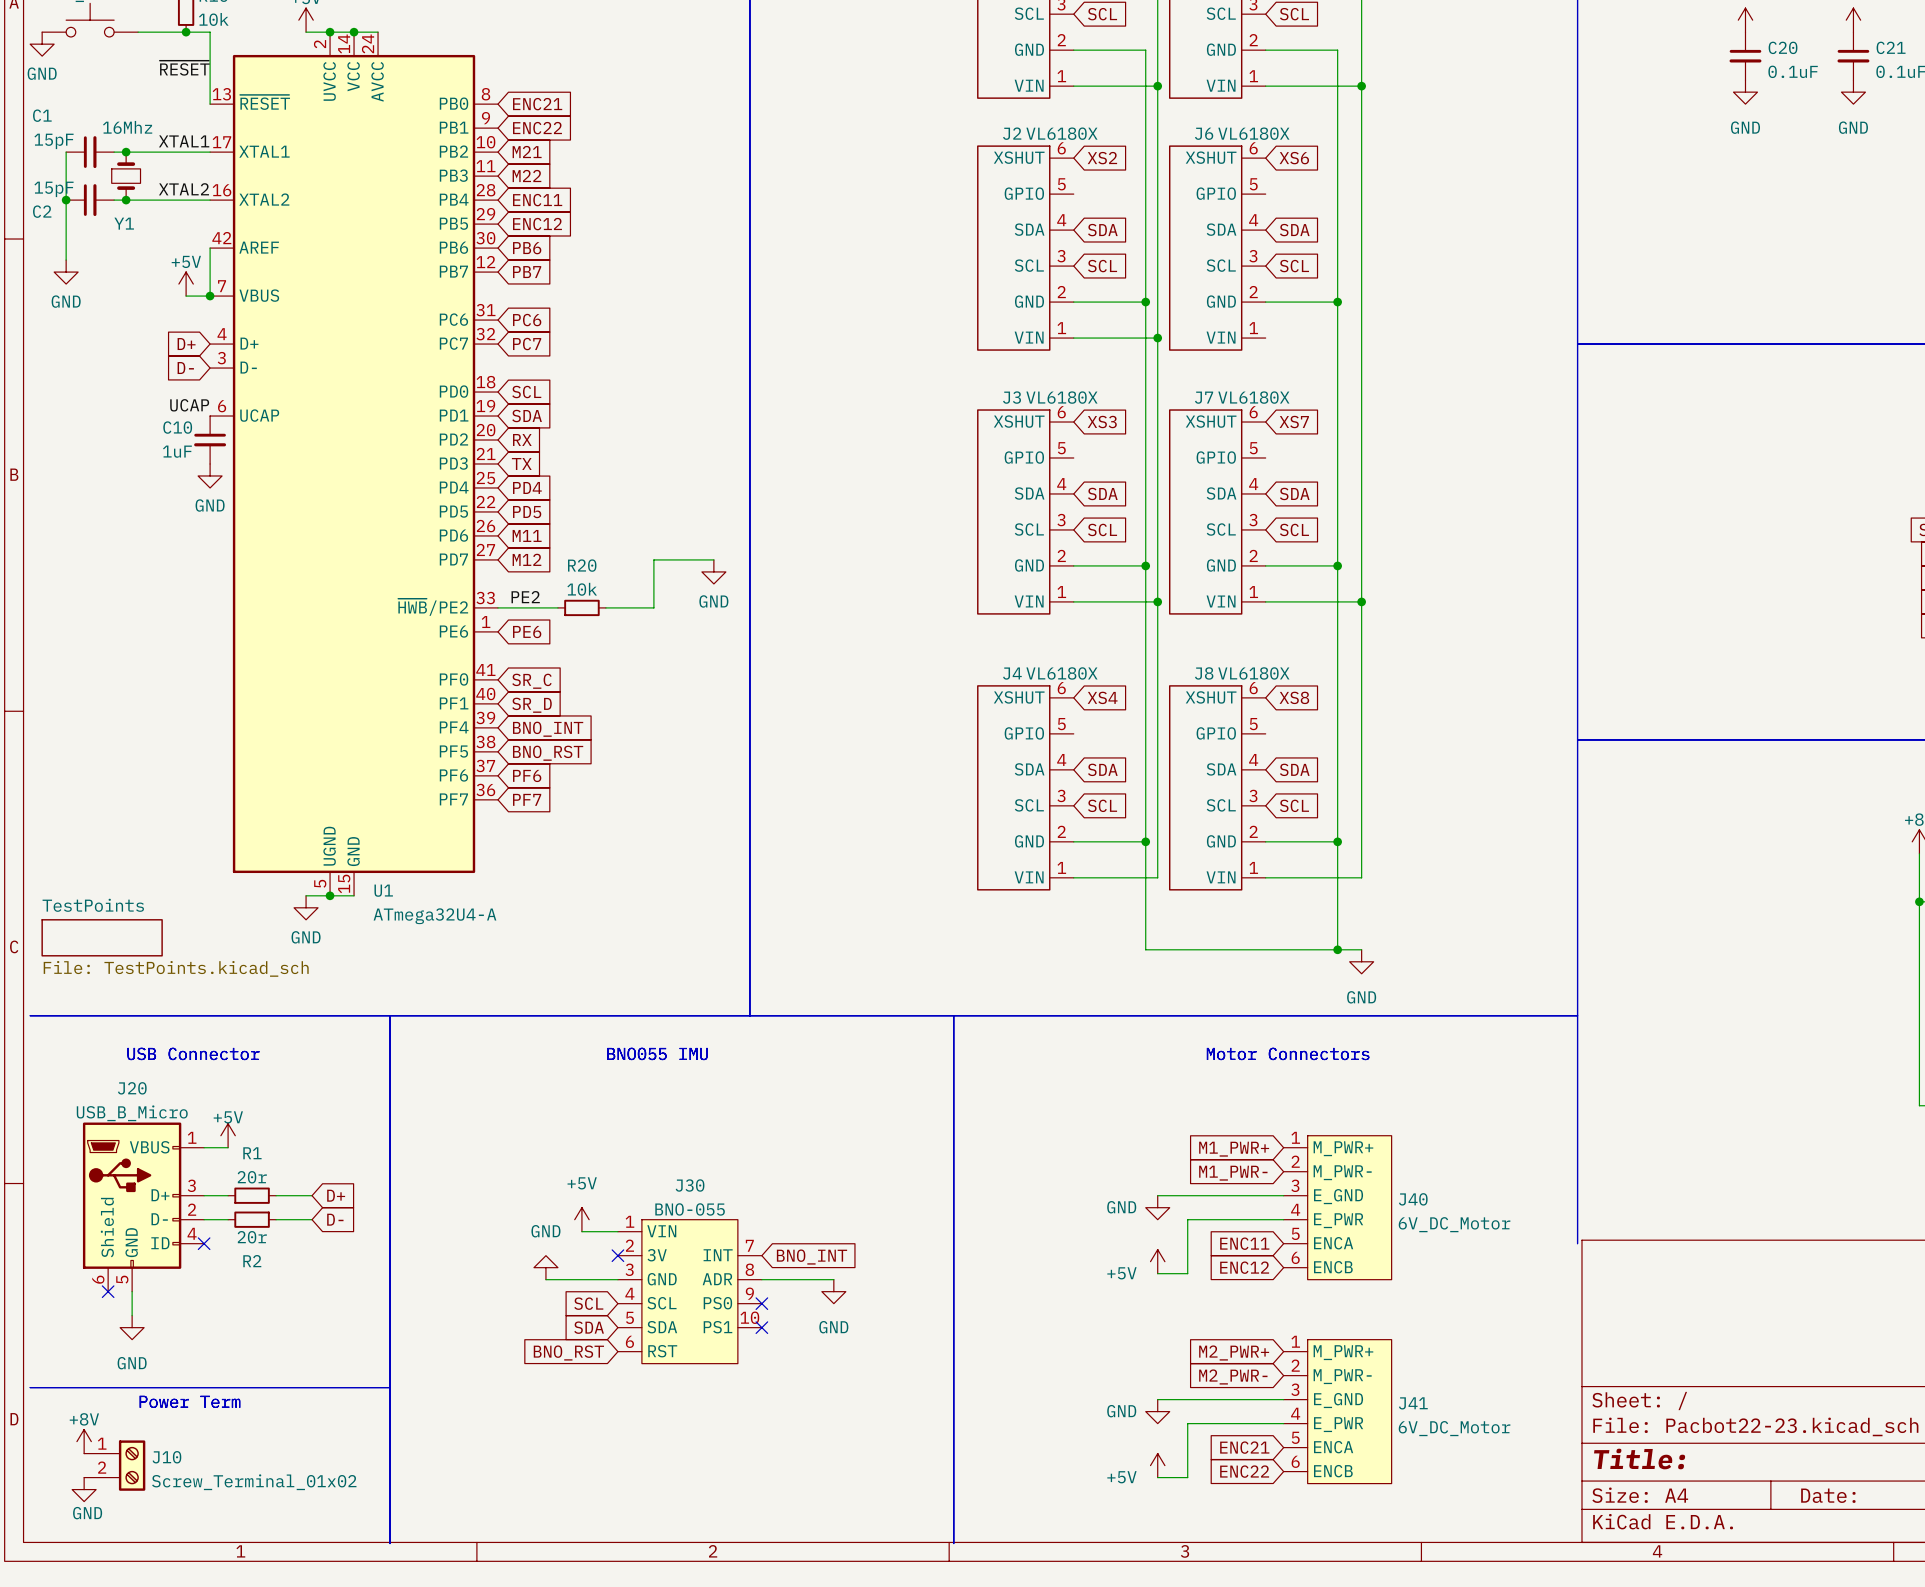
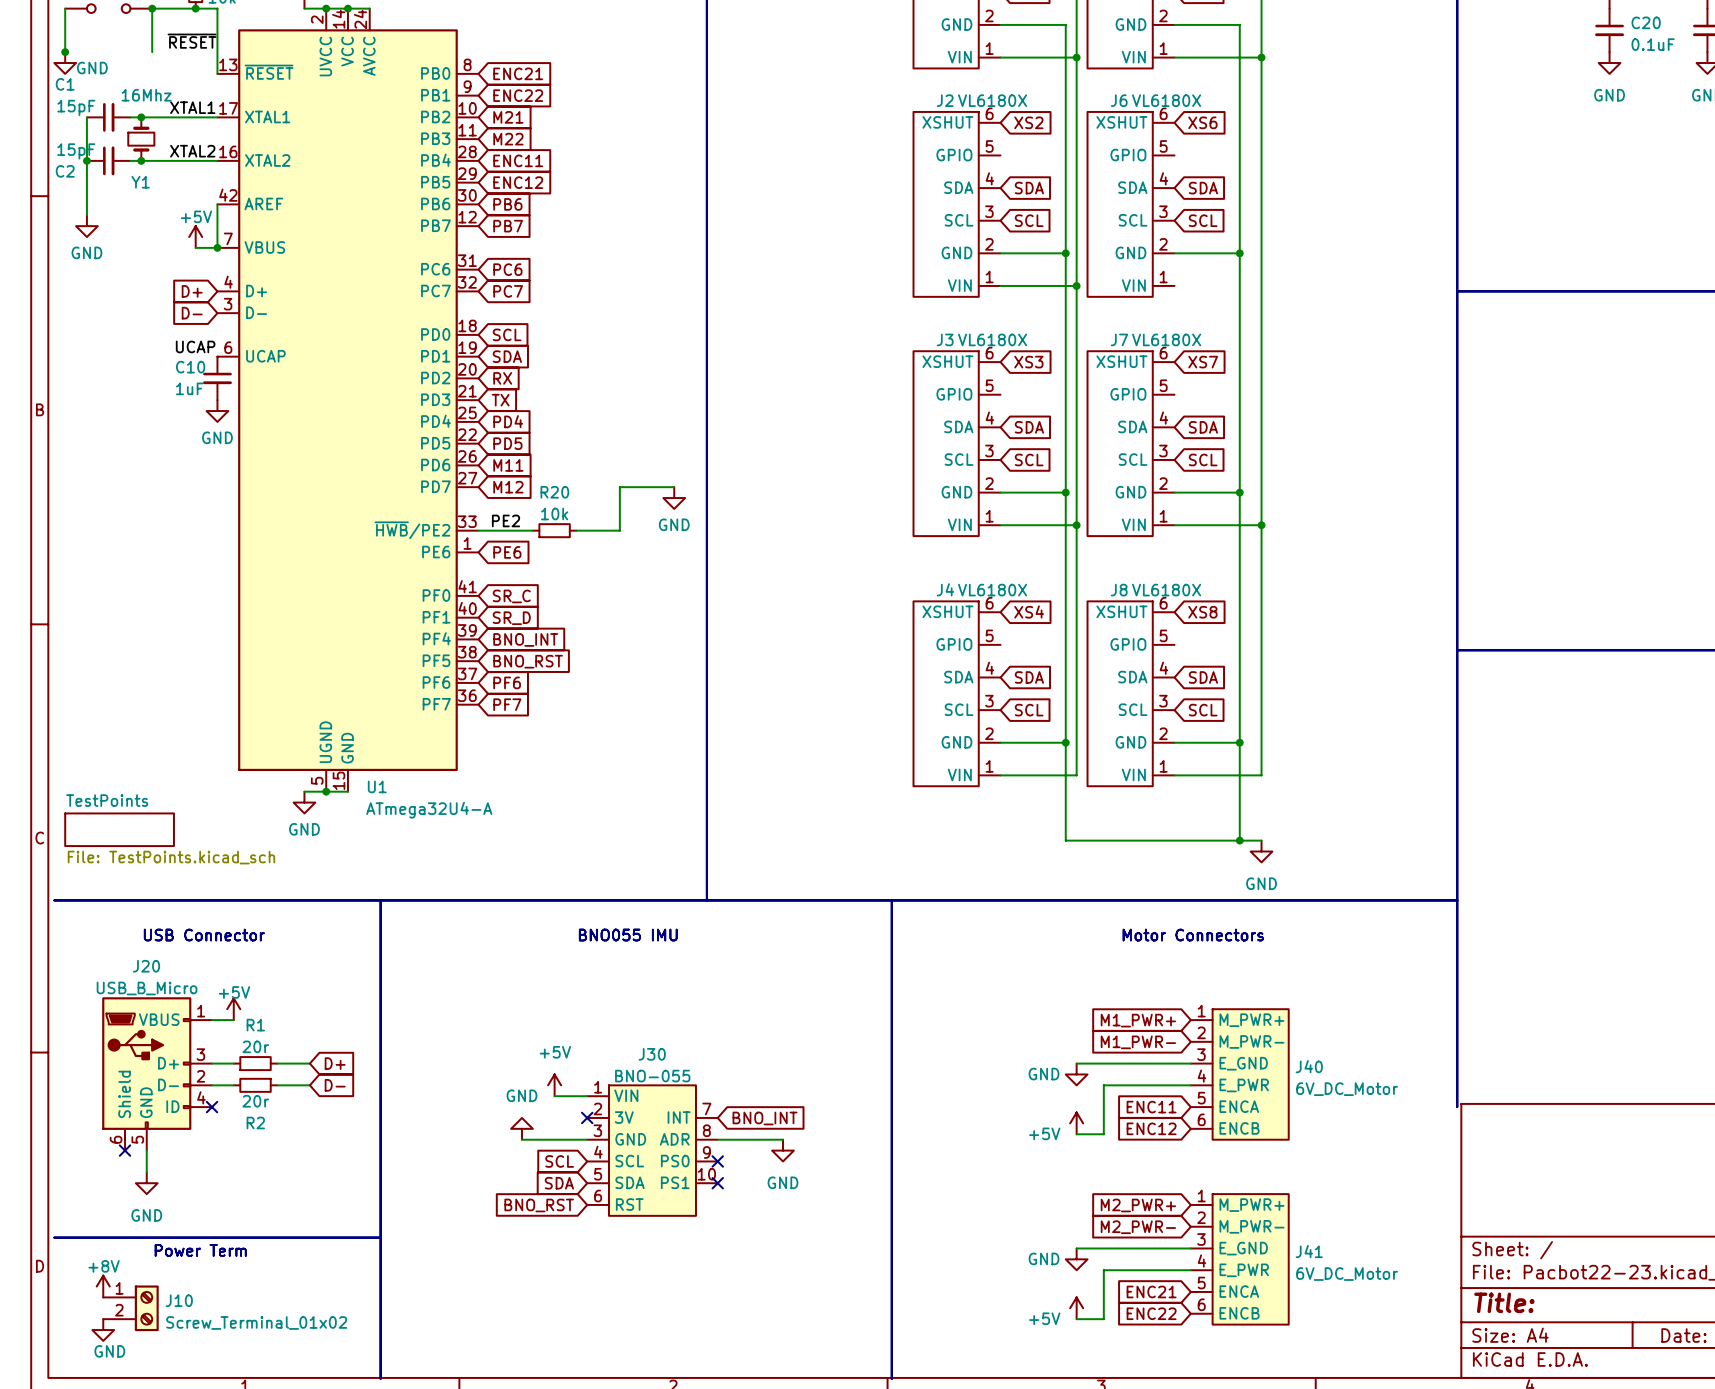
wire: none -> (65, 8) (65, 52)
wire: none -> (152, 8) (152, 52)
junction: none -> (152, 8)
power symbol position: GND (42, 44) -> GND (65, 63)
power symbol text position: GND (42, 73) -> GND (92, 68)
junction: none -> (65, 52)

